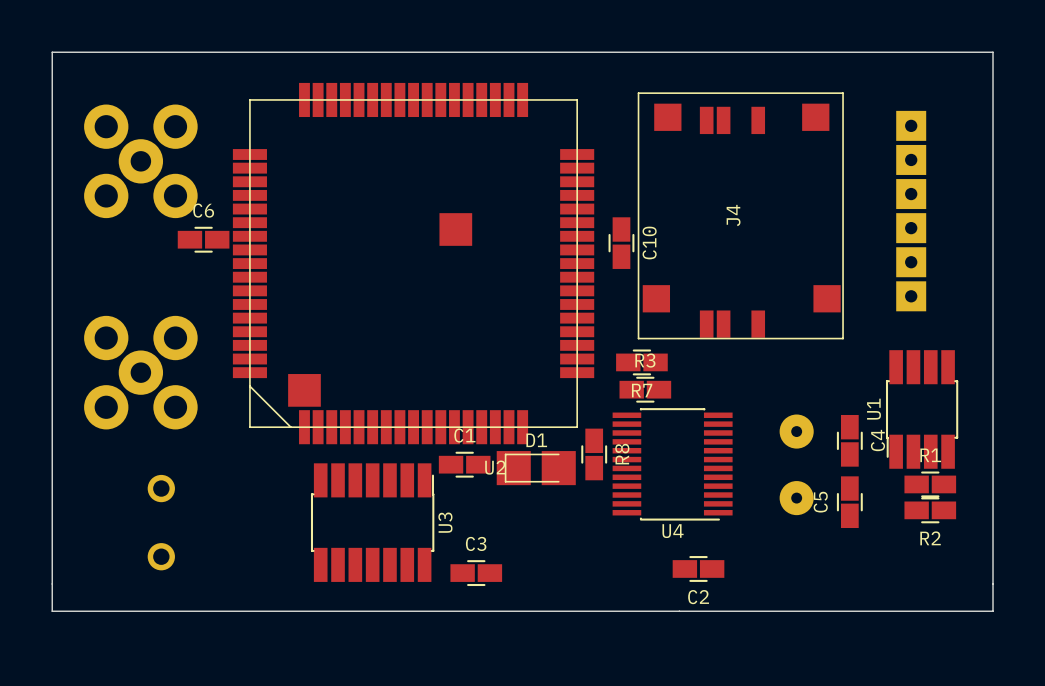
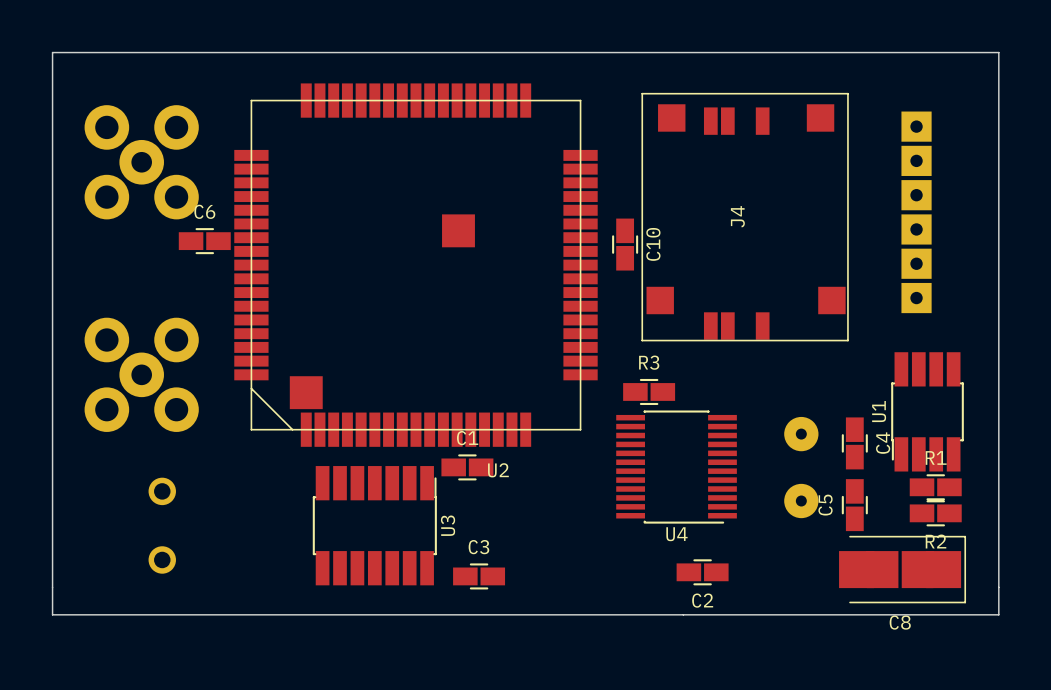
R7: (641, 362) -> none
R8: (594, 454) -> none
D1: (536, 468) -> none
C8: none -> (902, 569)

